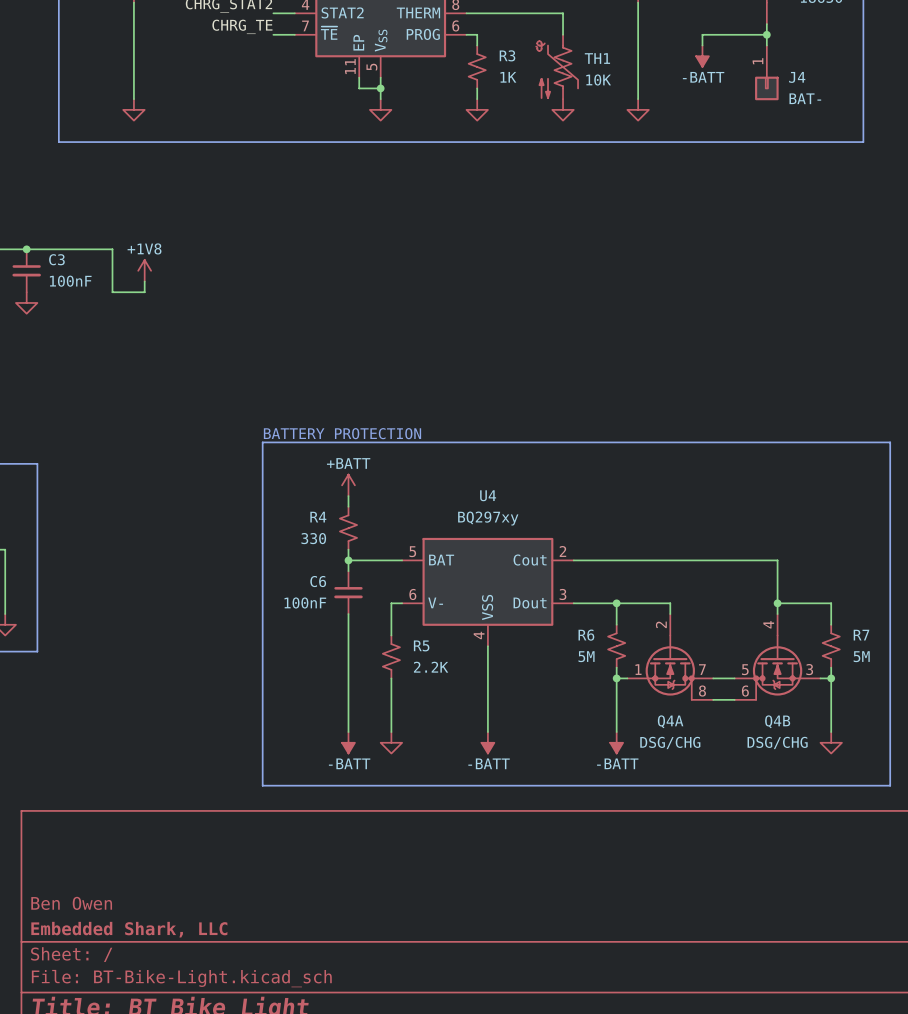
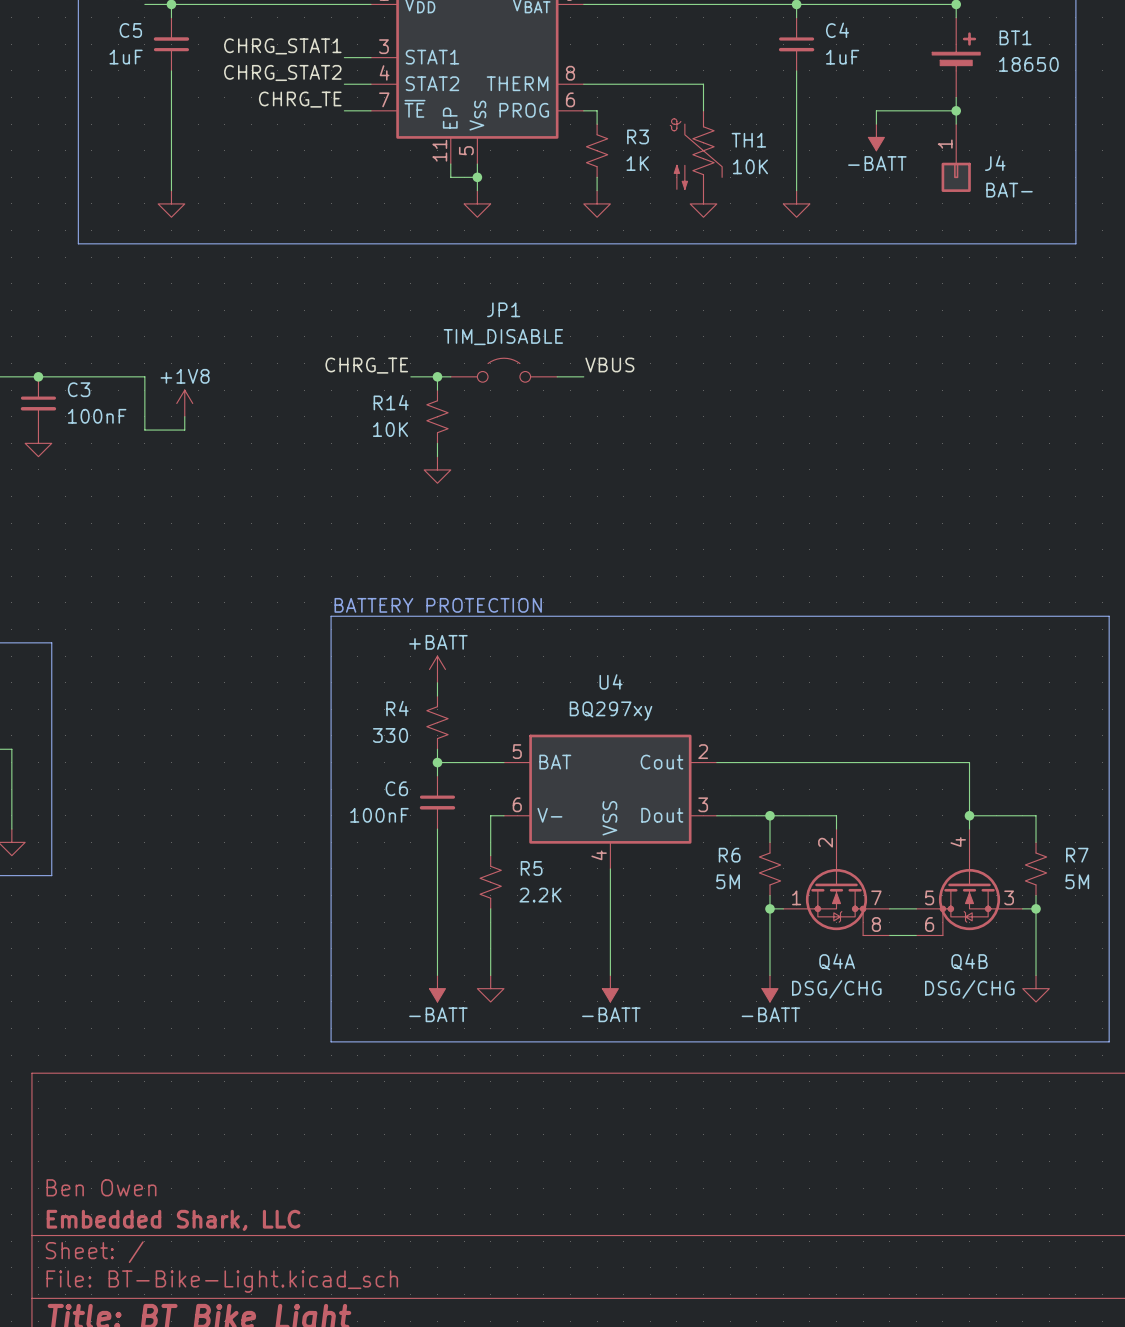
label: none -> VBUS (609, 364)
label: none -> CHRG_TE (366, 365)
JP1: none -> TIM_DISABLE (503, 370)
wire: none -> (410, 376) (450, 376)
wire: none -> (437, 376) (437, 390)
junction: none -> (437, 376)
wire: none -> (557, 376) (583, 376)
R14: none -> 10K (437, 416)
wire: none -> (437, 443) (437, 456)
power symbol: none -> (437, 469)

